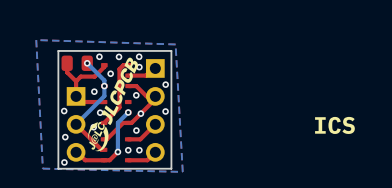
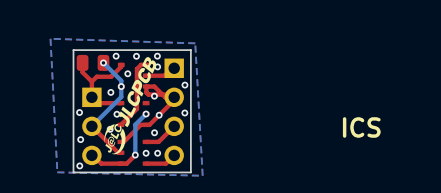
top track: none -> (146, 86) (148, 94) (171, 94)

